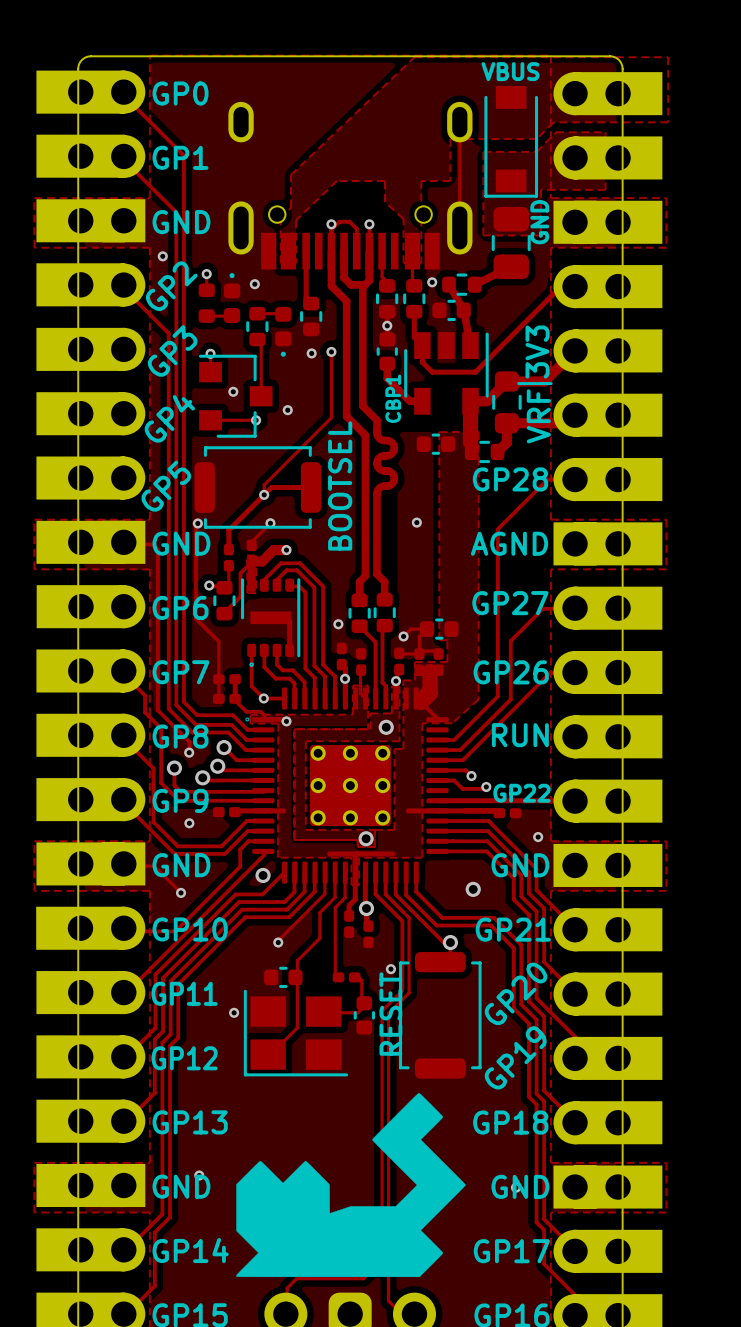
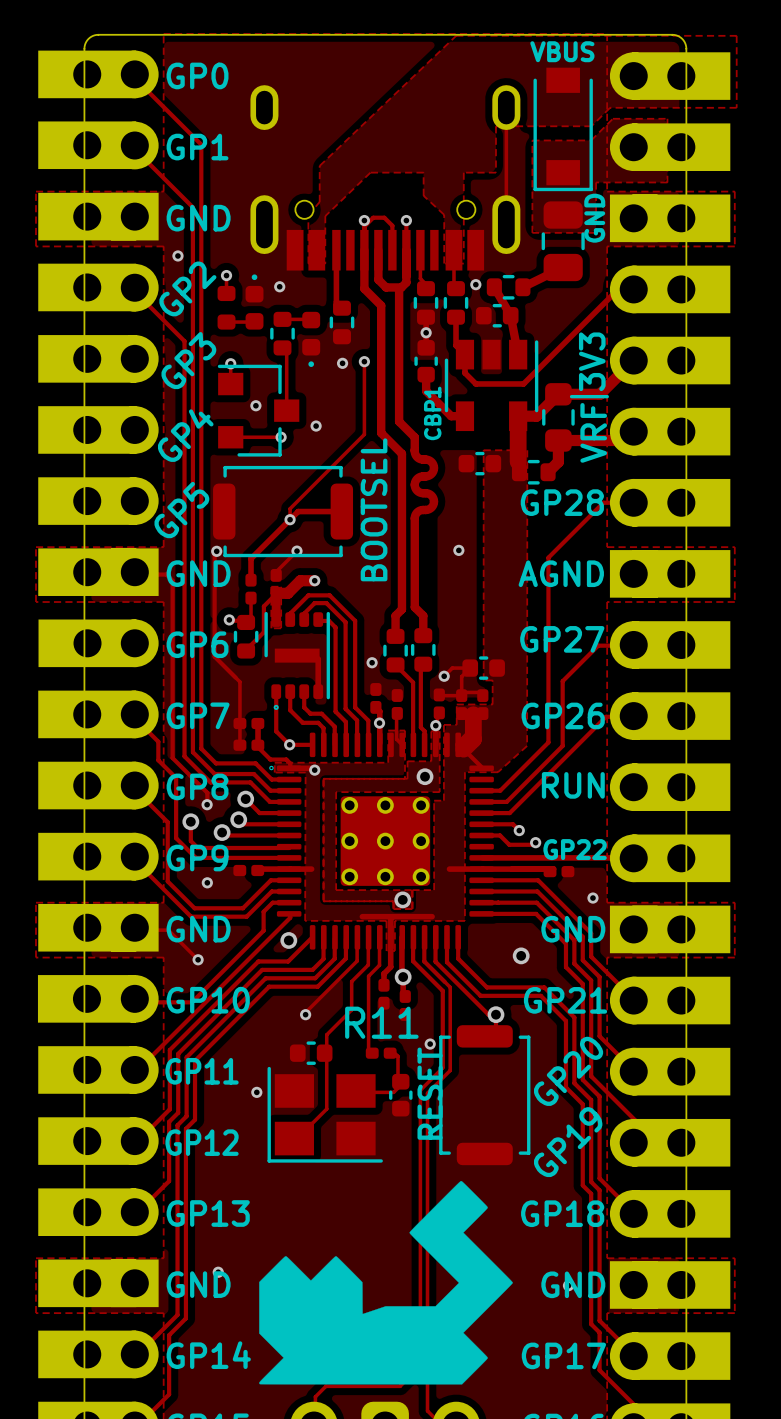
R11 name: none -> R11 (381, 1022)

